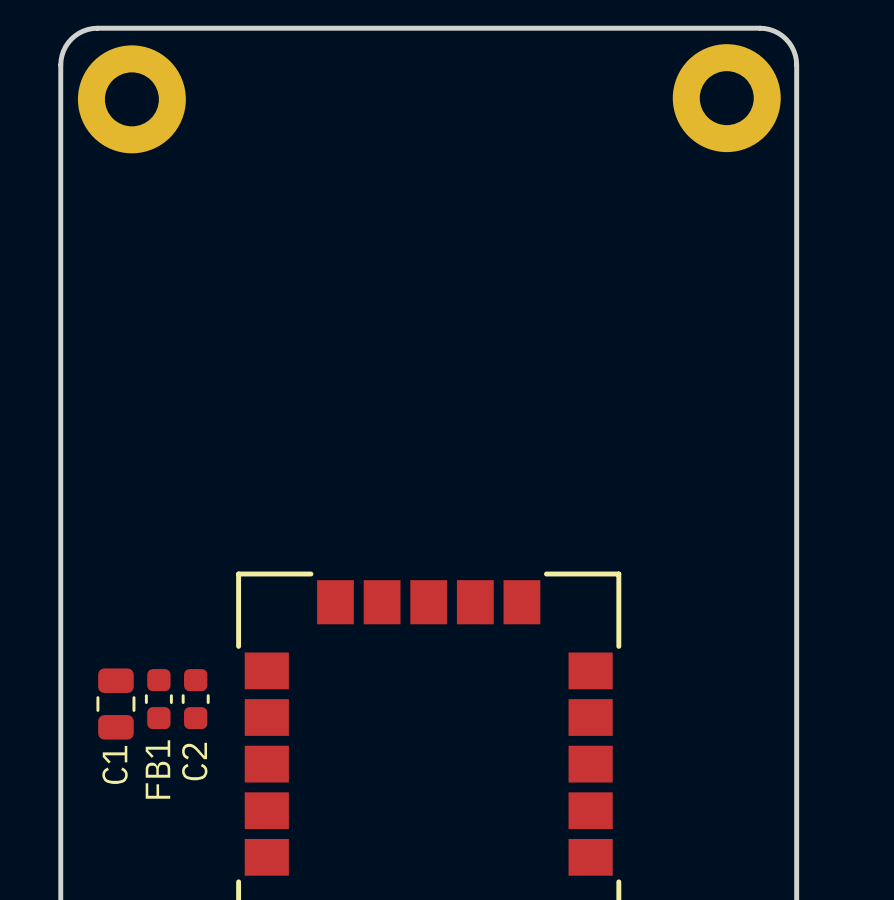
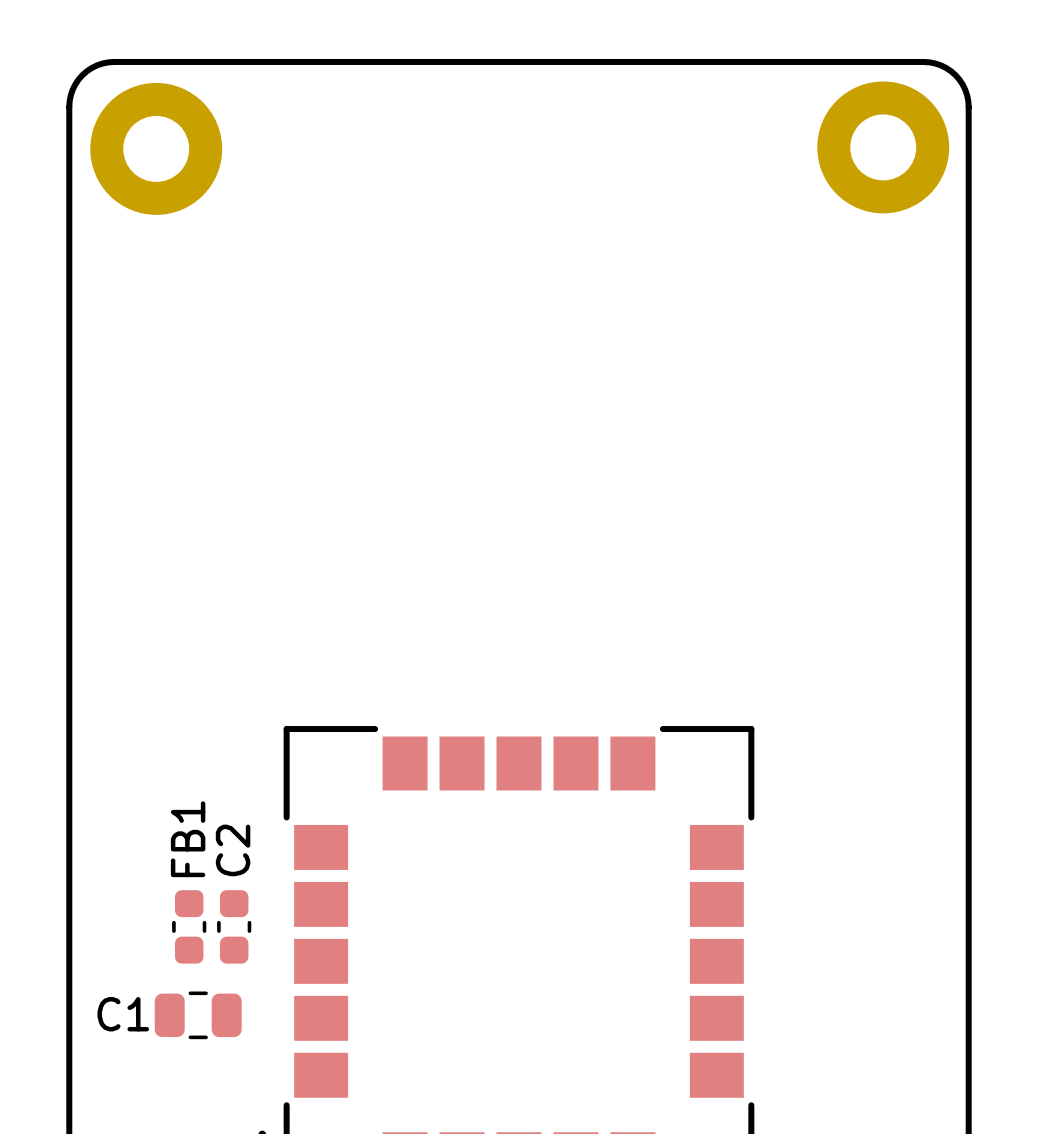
FB1 position: (158, 699) -> (189, 926)
C2 position: (195, 699) -> (234, 926)
C1 rotation: 0° (115, 704) -> 90° clockwise (198, 1015)
C1 position: (115, 704) -> (198, 1015)
C2 name position: C2 (194, 761) -> C2 (233, 850)
FB1 name position: FB1 (157, 769) -> FB1 (188, 839)

